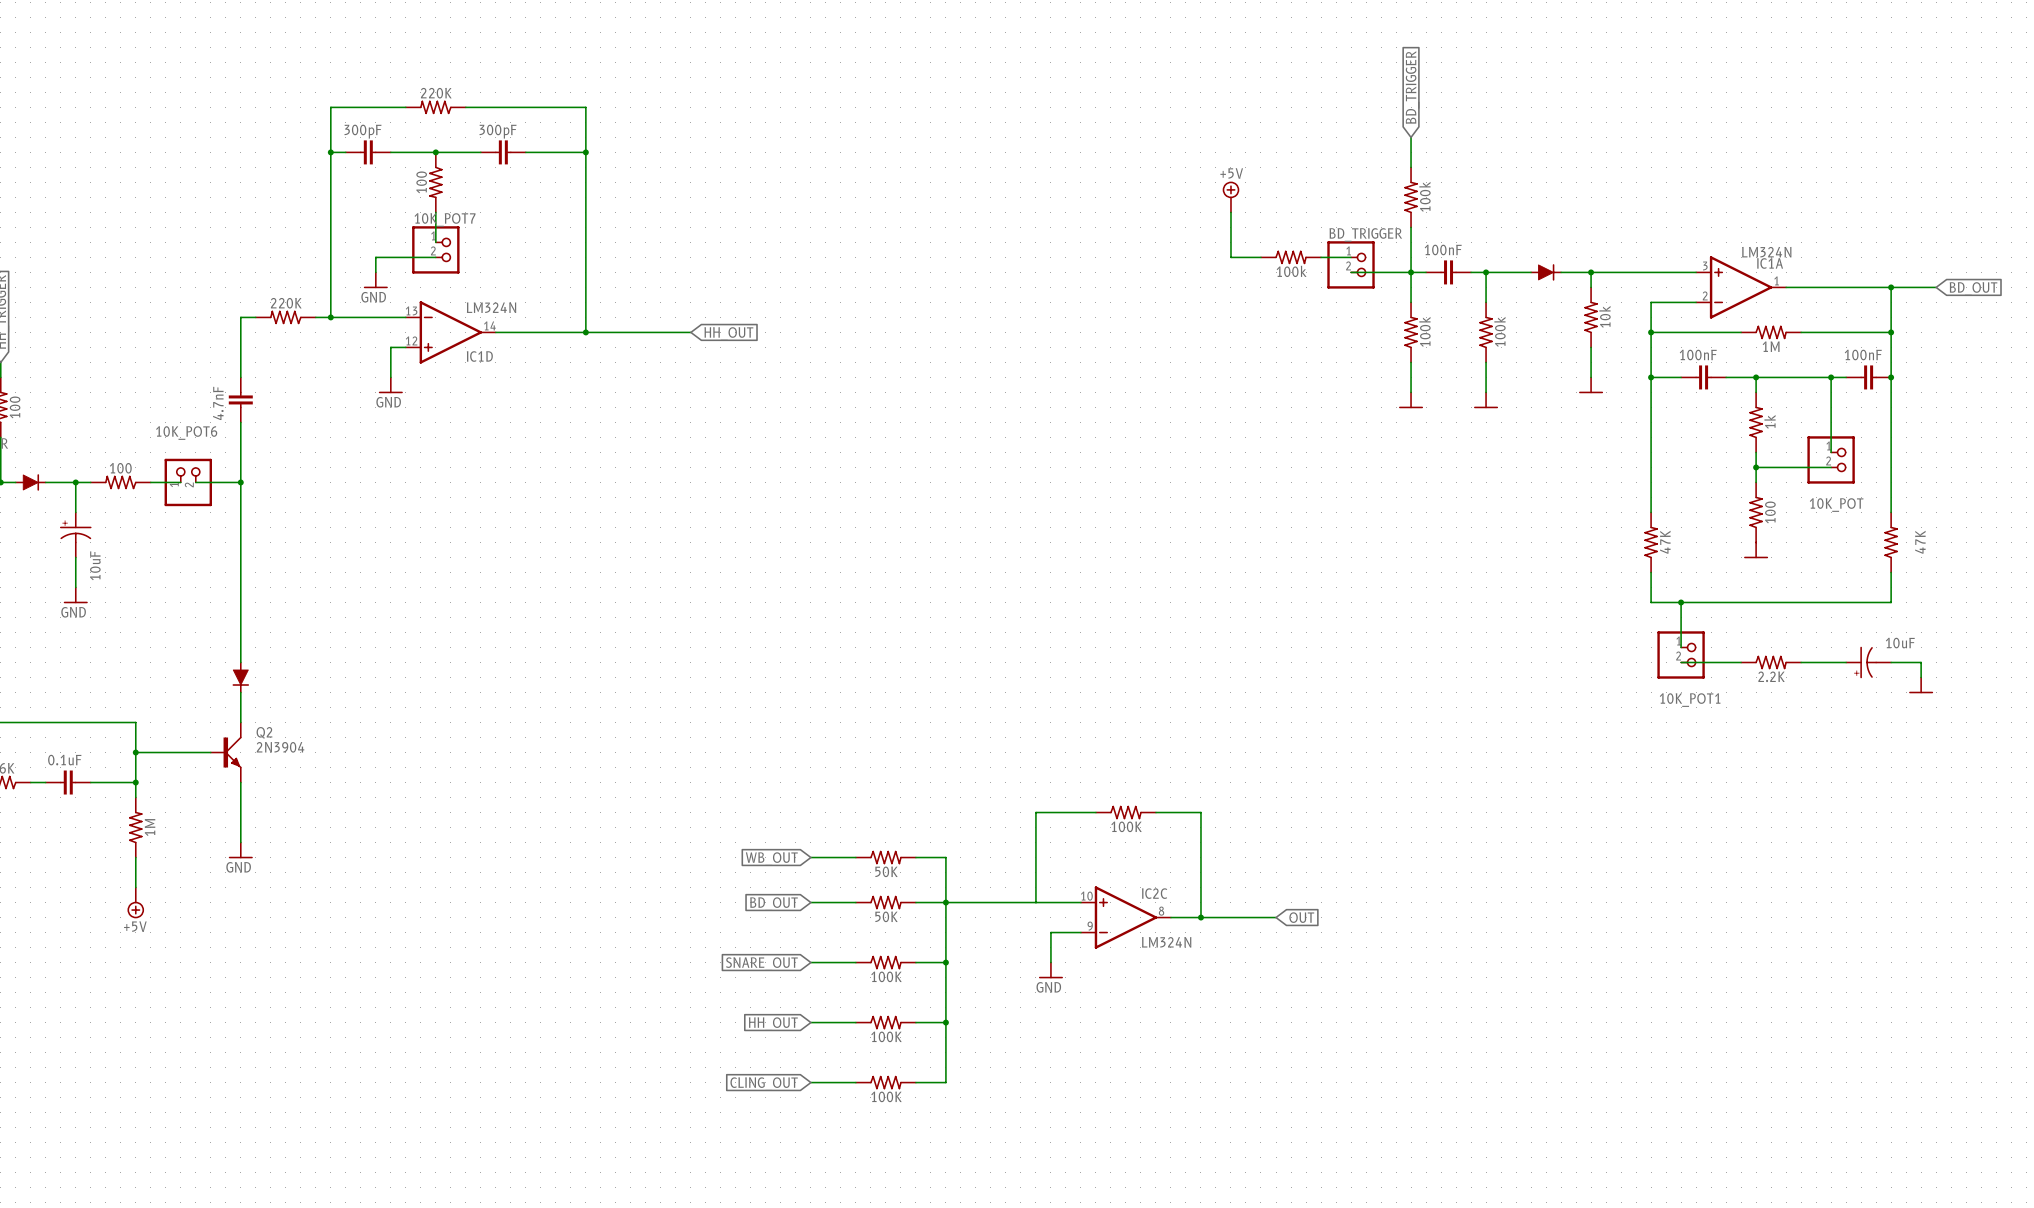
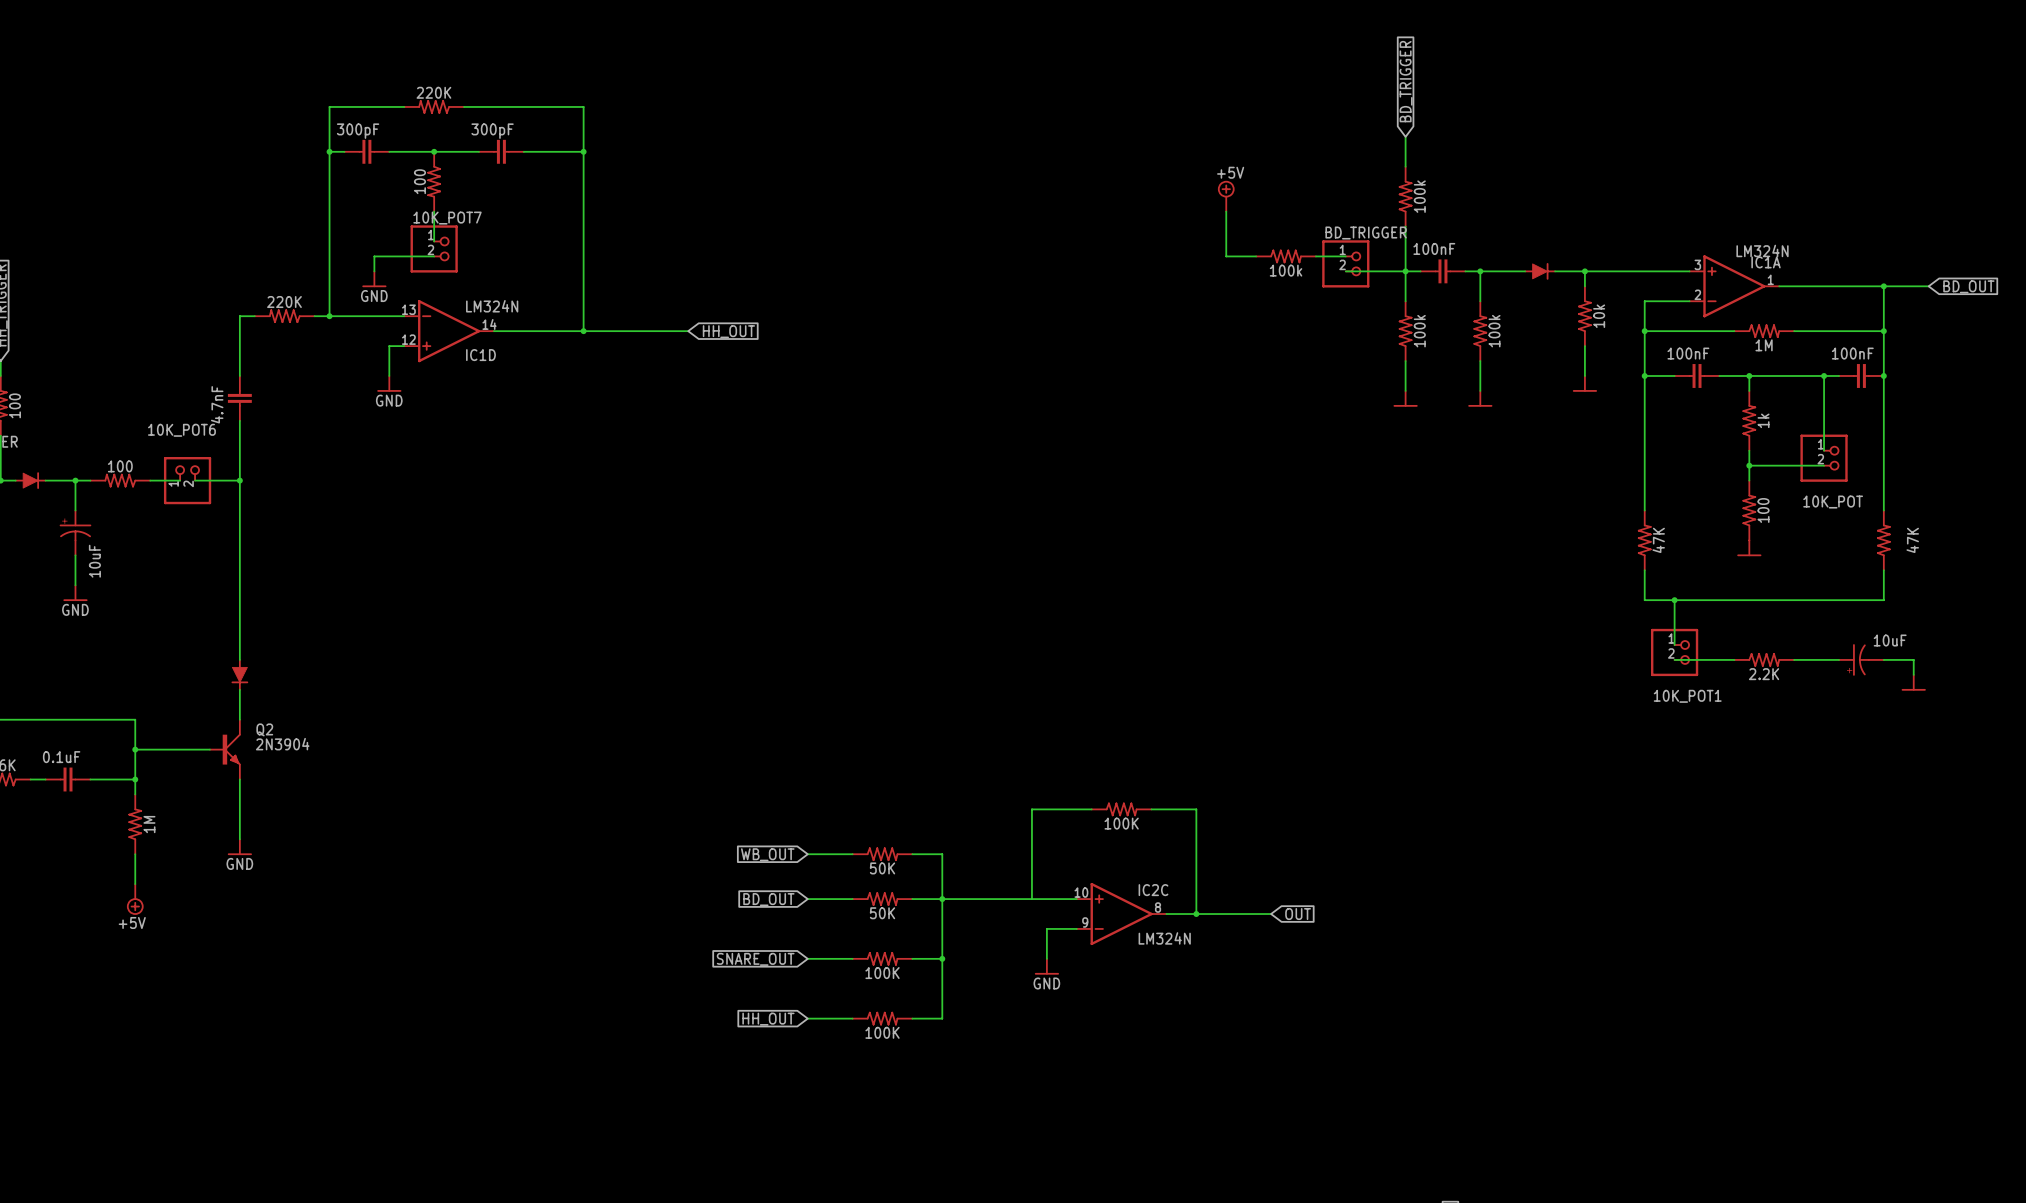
wire: (945, 1022) (945, 1082) (915, 1082) -> none
junction: (945, 1022) -> none
wire: (810, 1082) (855, 1082) -> none
part: 100K (885, 1082) -> none
global label: CLING_OUT (764, 1084) -> none

